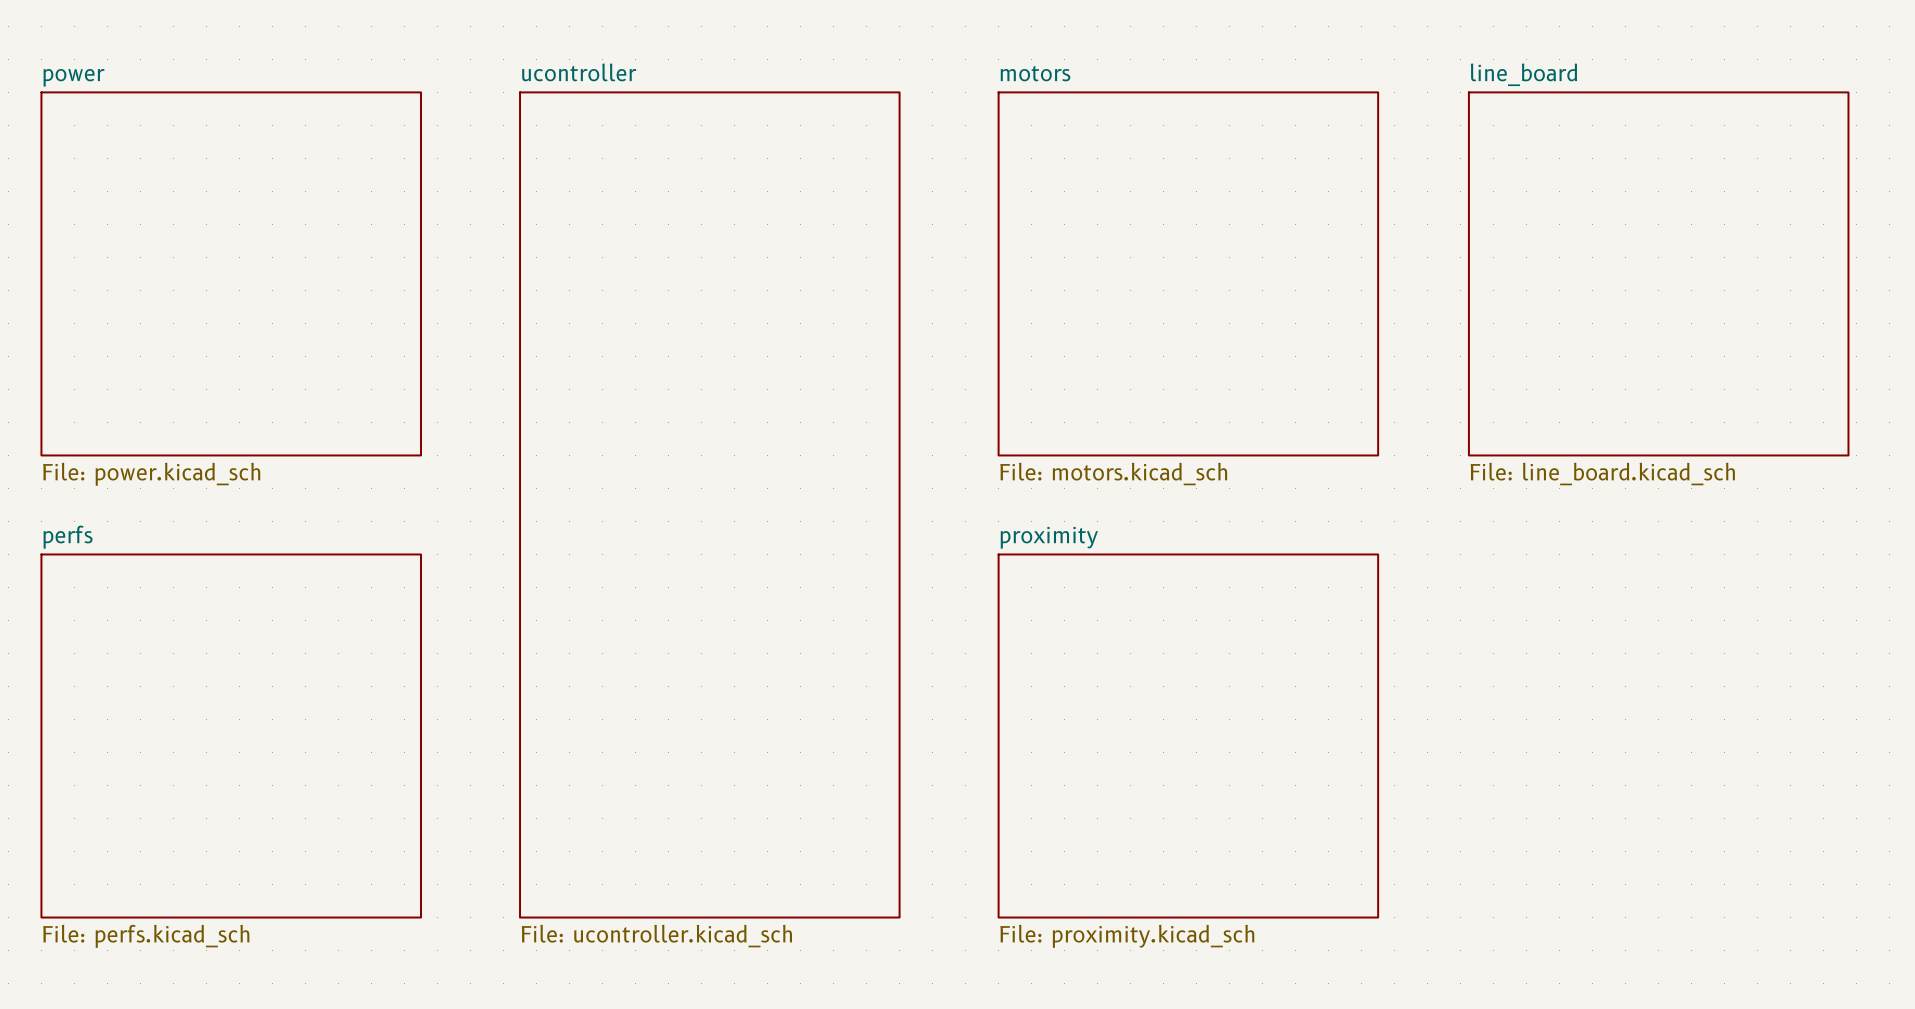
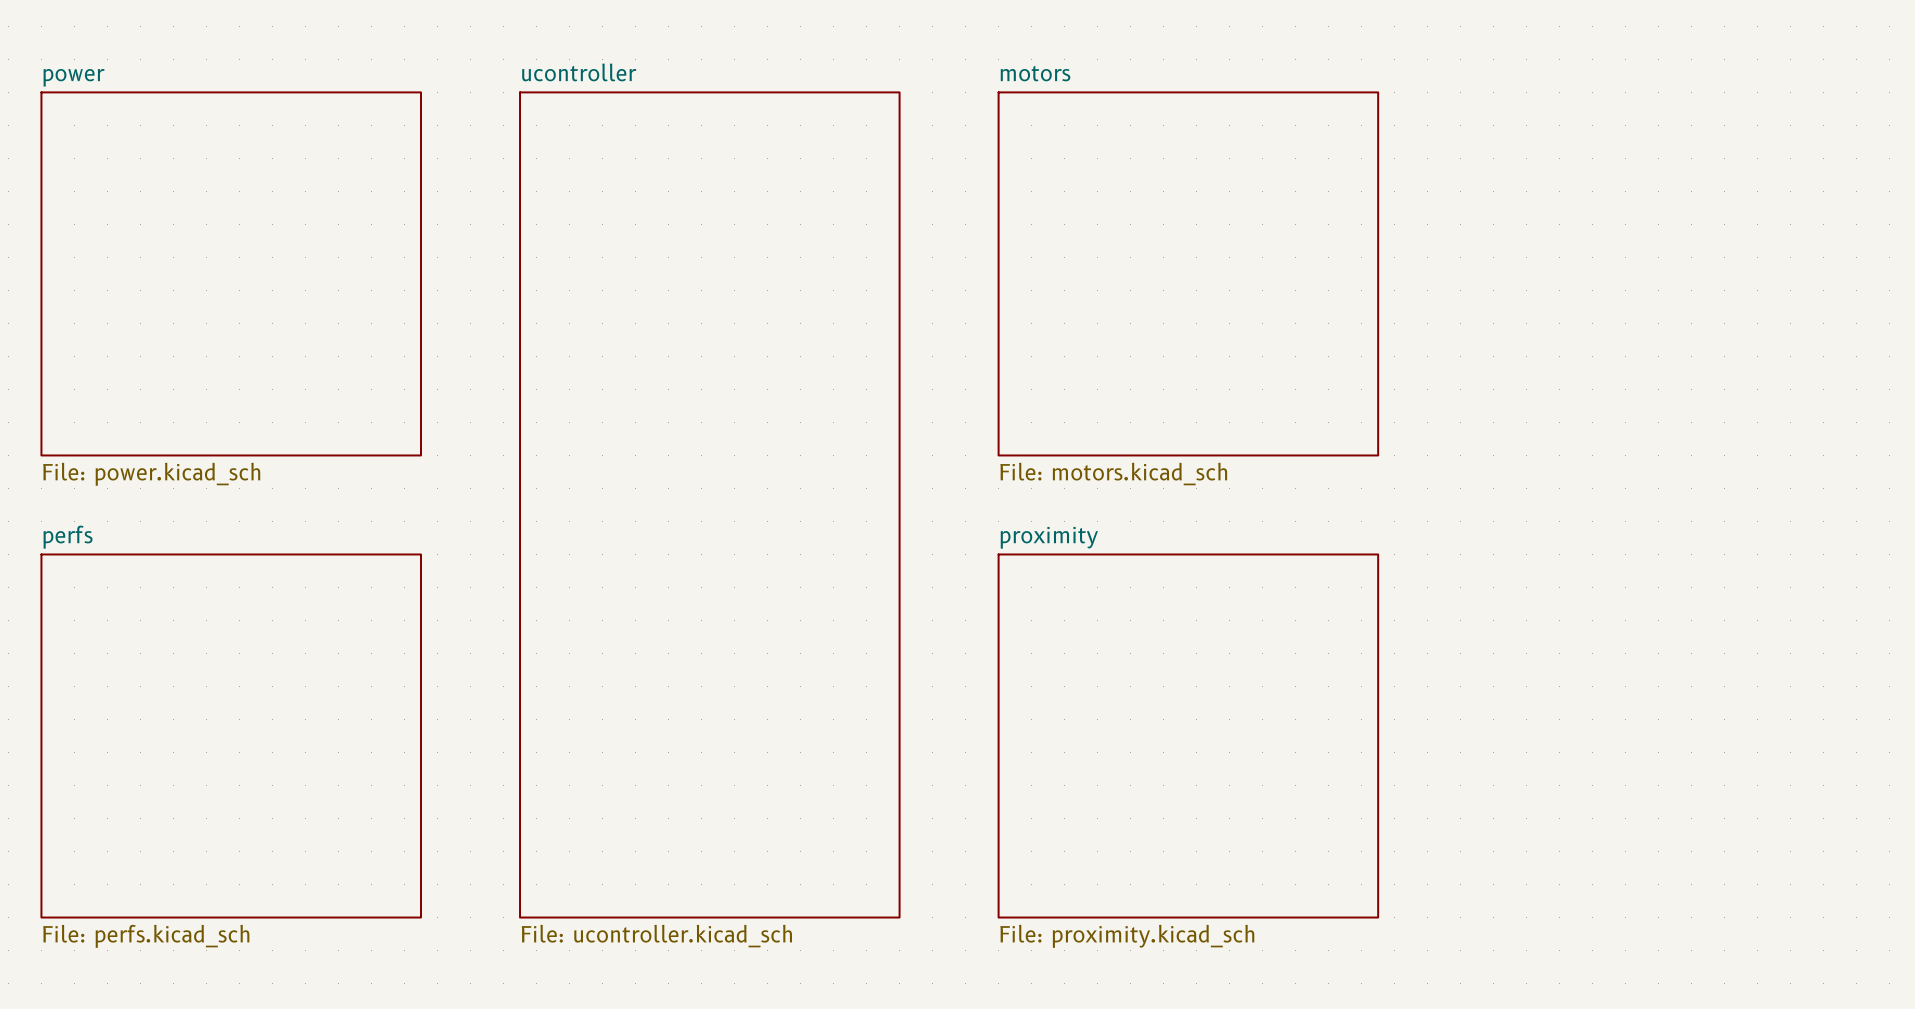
sheet line_board: File: line_board.kicad_sch (1658, 273) -> none

